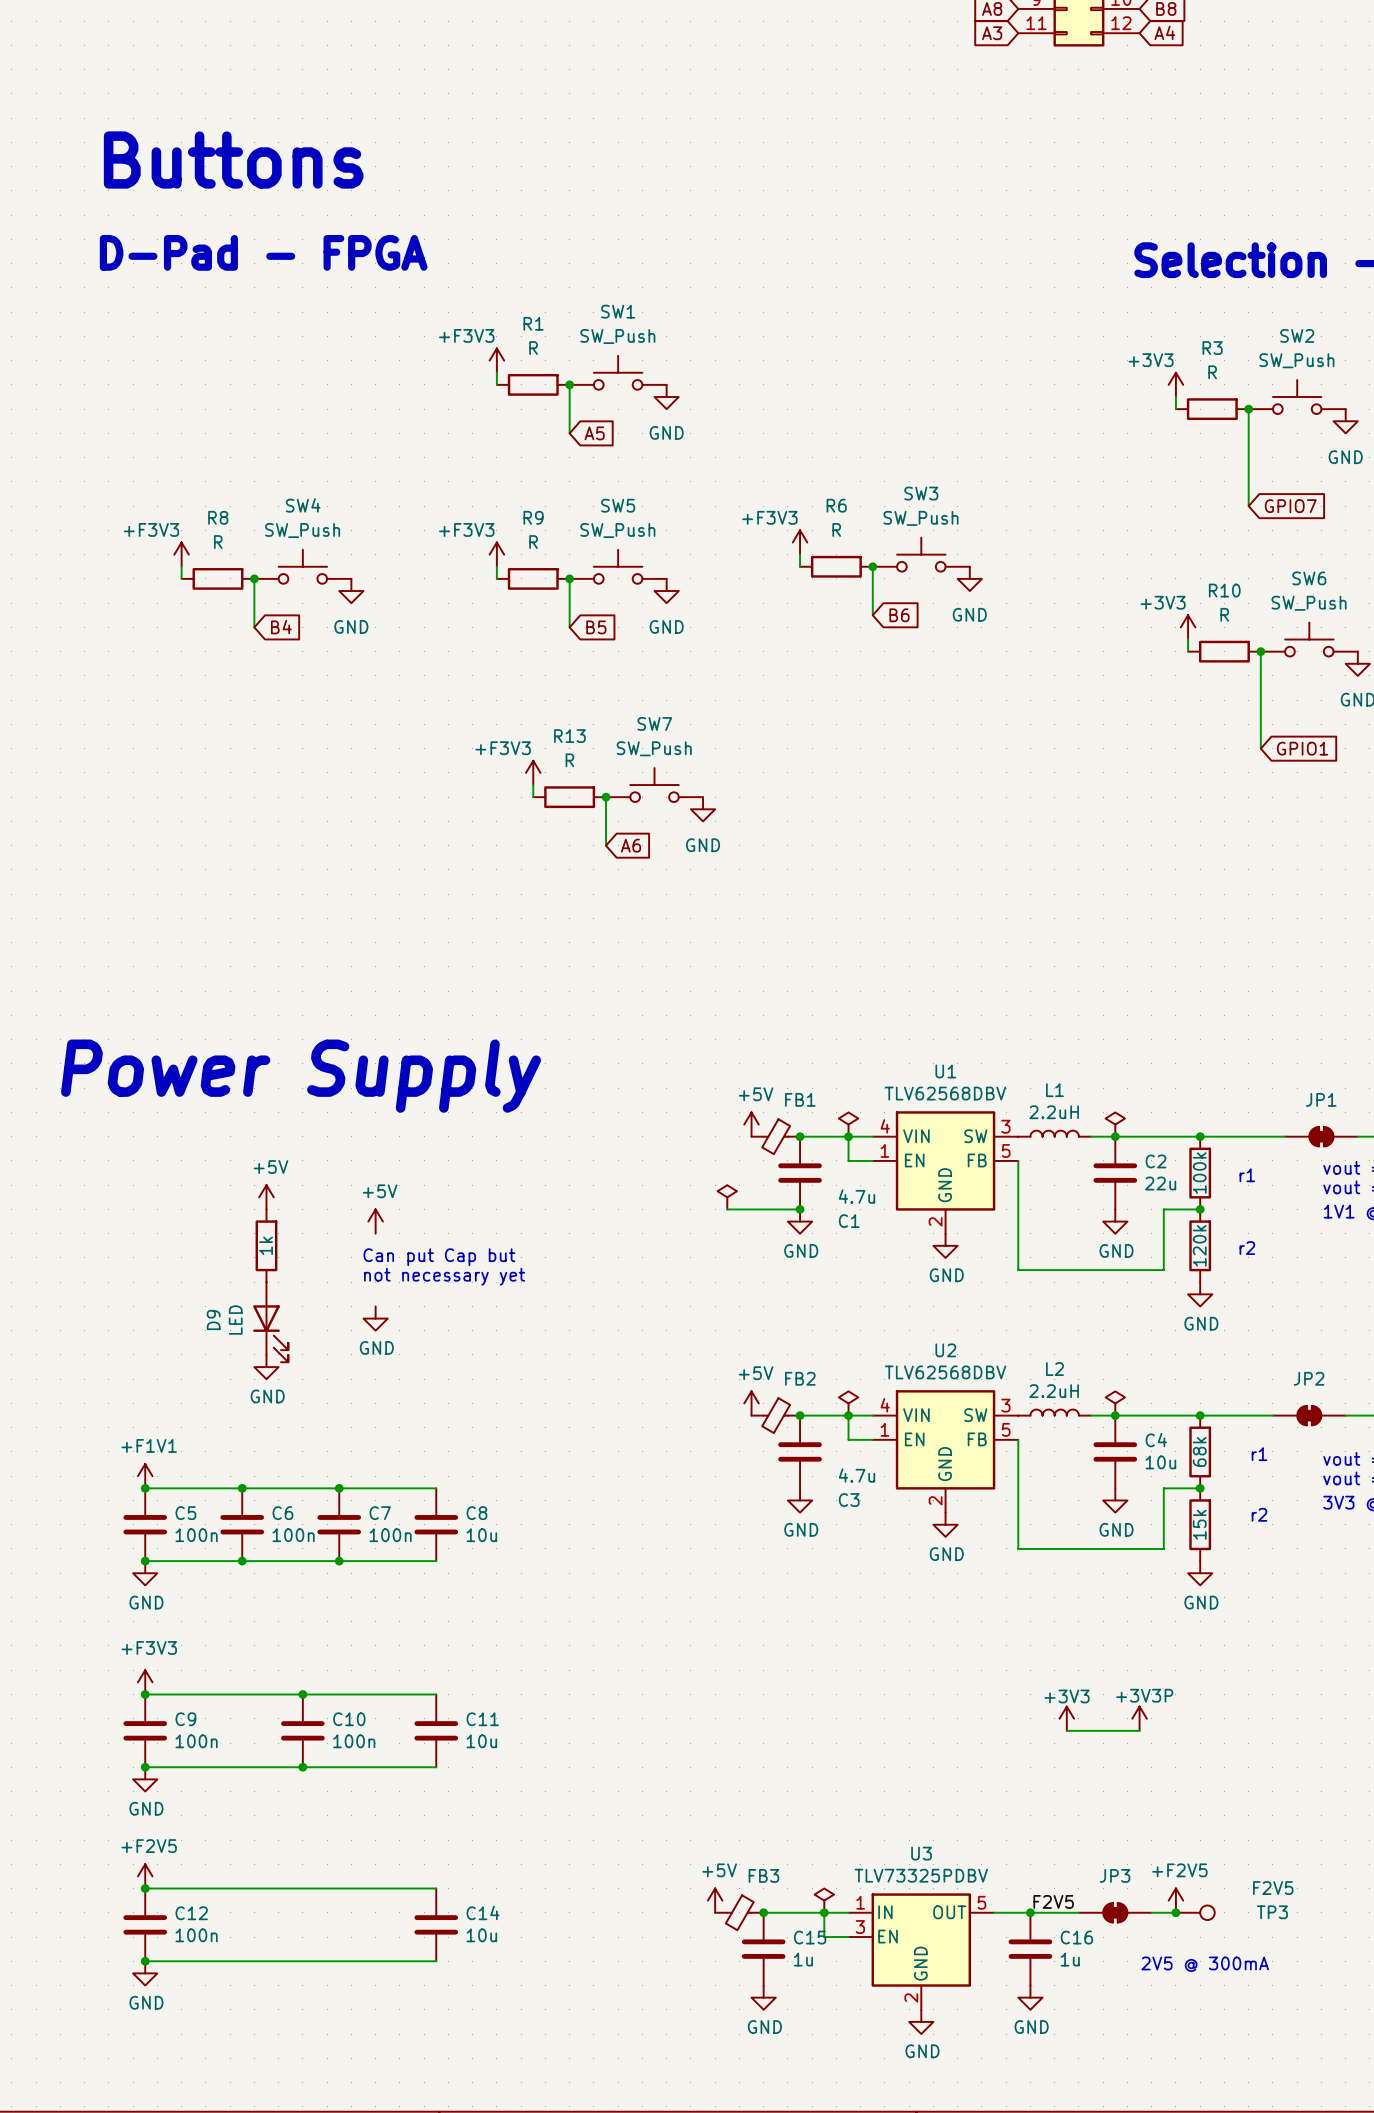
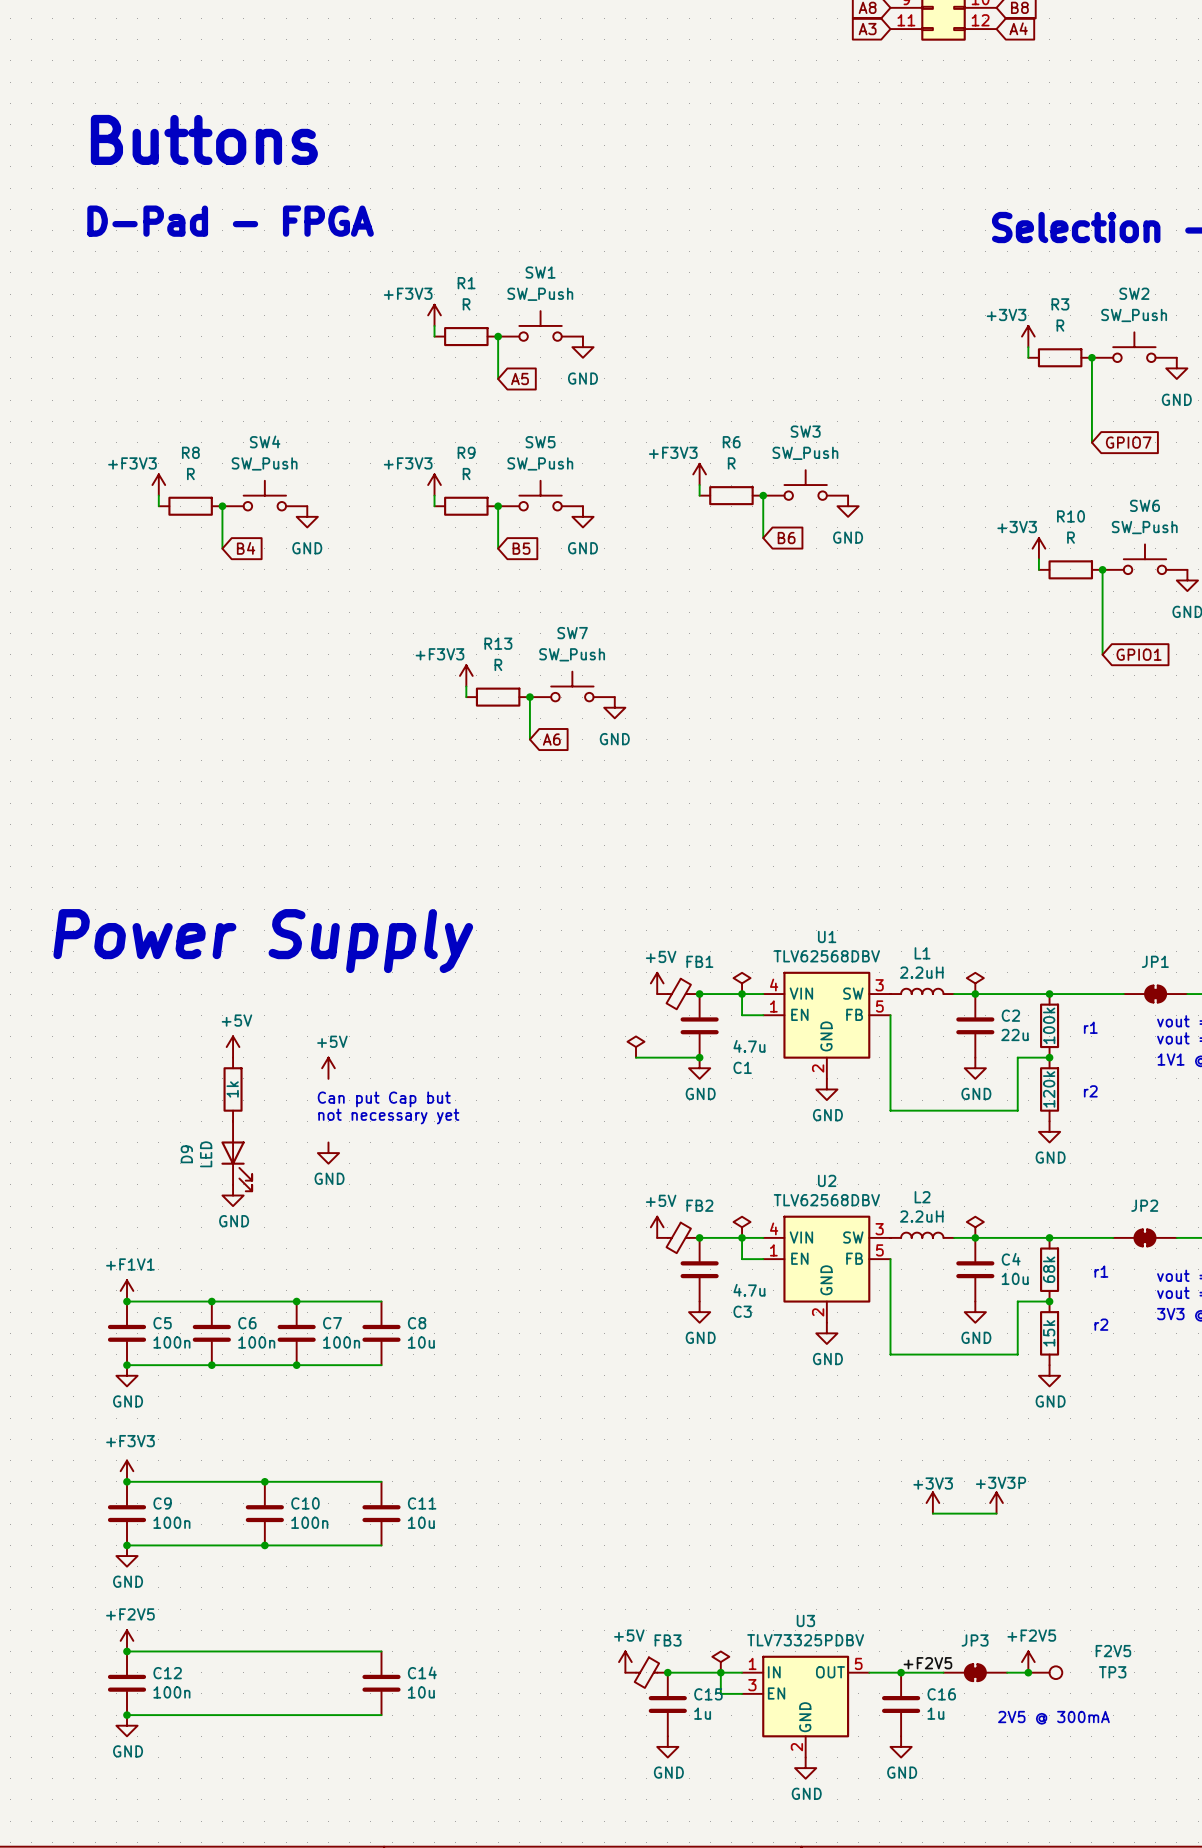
label: F2V5 (1053, 1901) -> +F2V5 (927, 1663)

